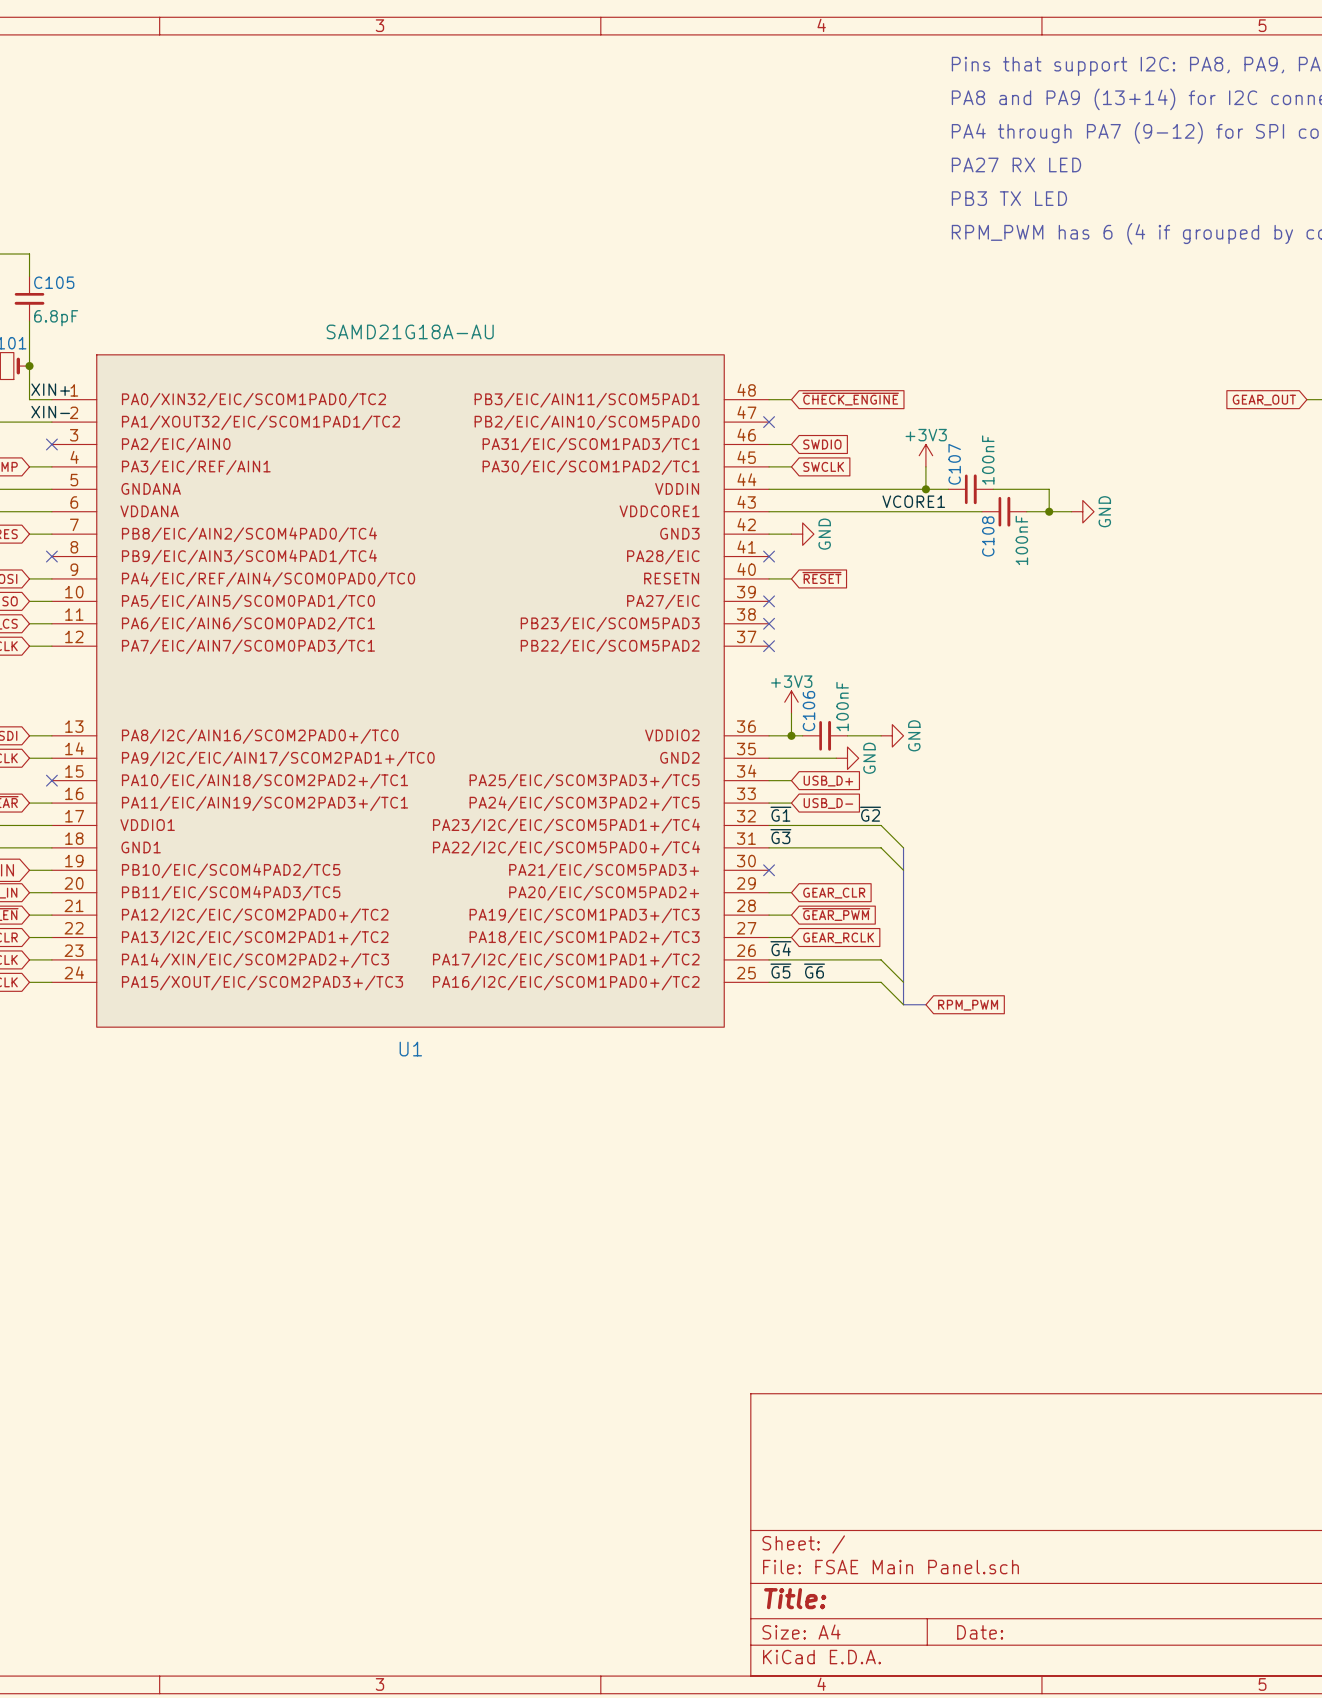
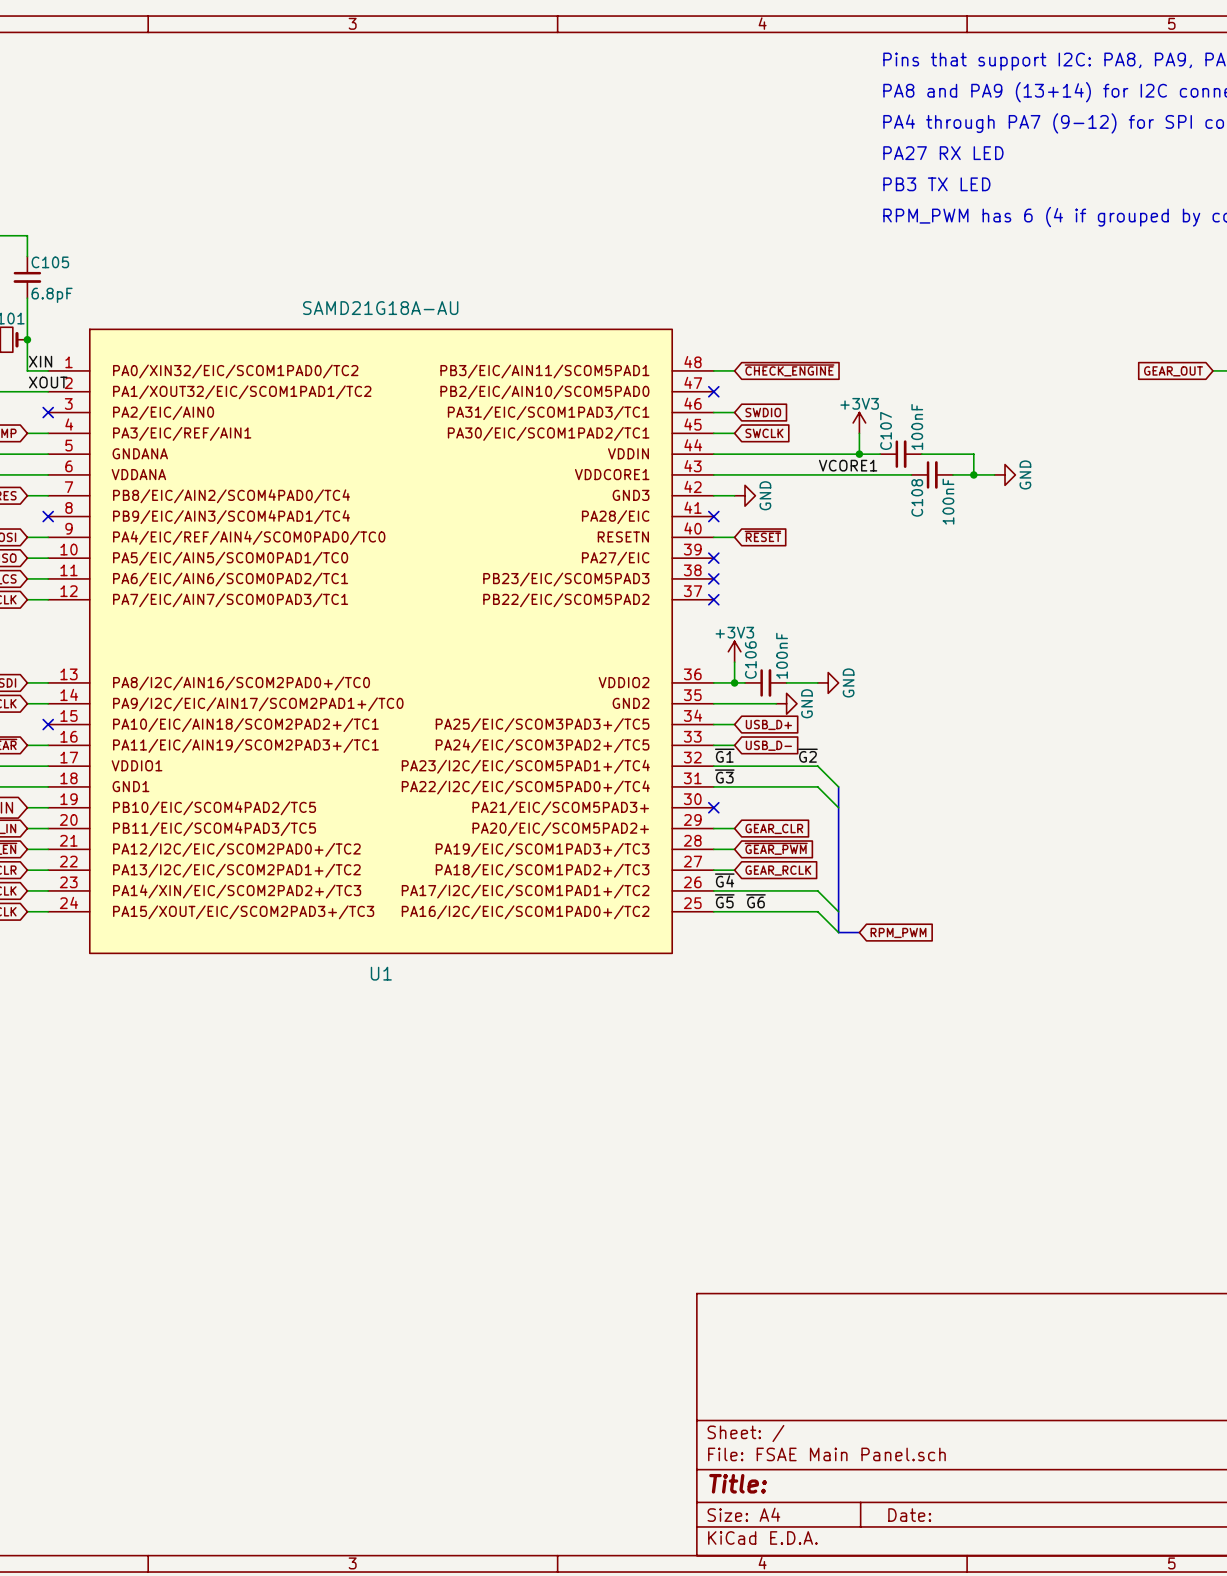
label: XIN+ (50, 389) -> XIN (40, 361)
label: XIN- (50, 412) -> XOUT (48, 382)

